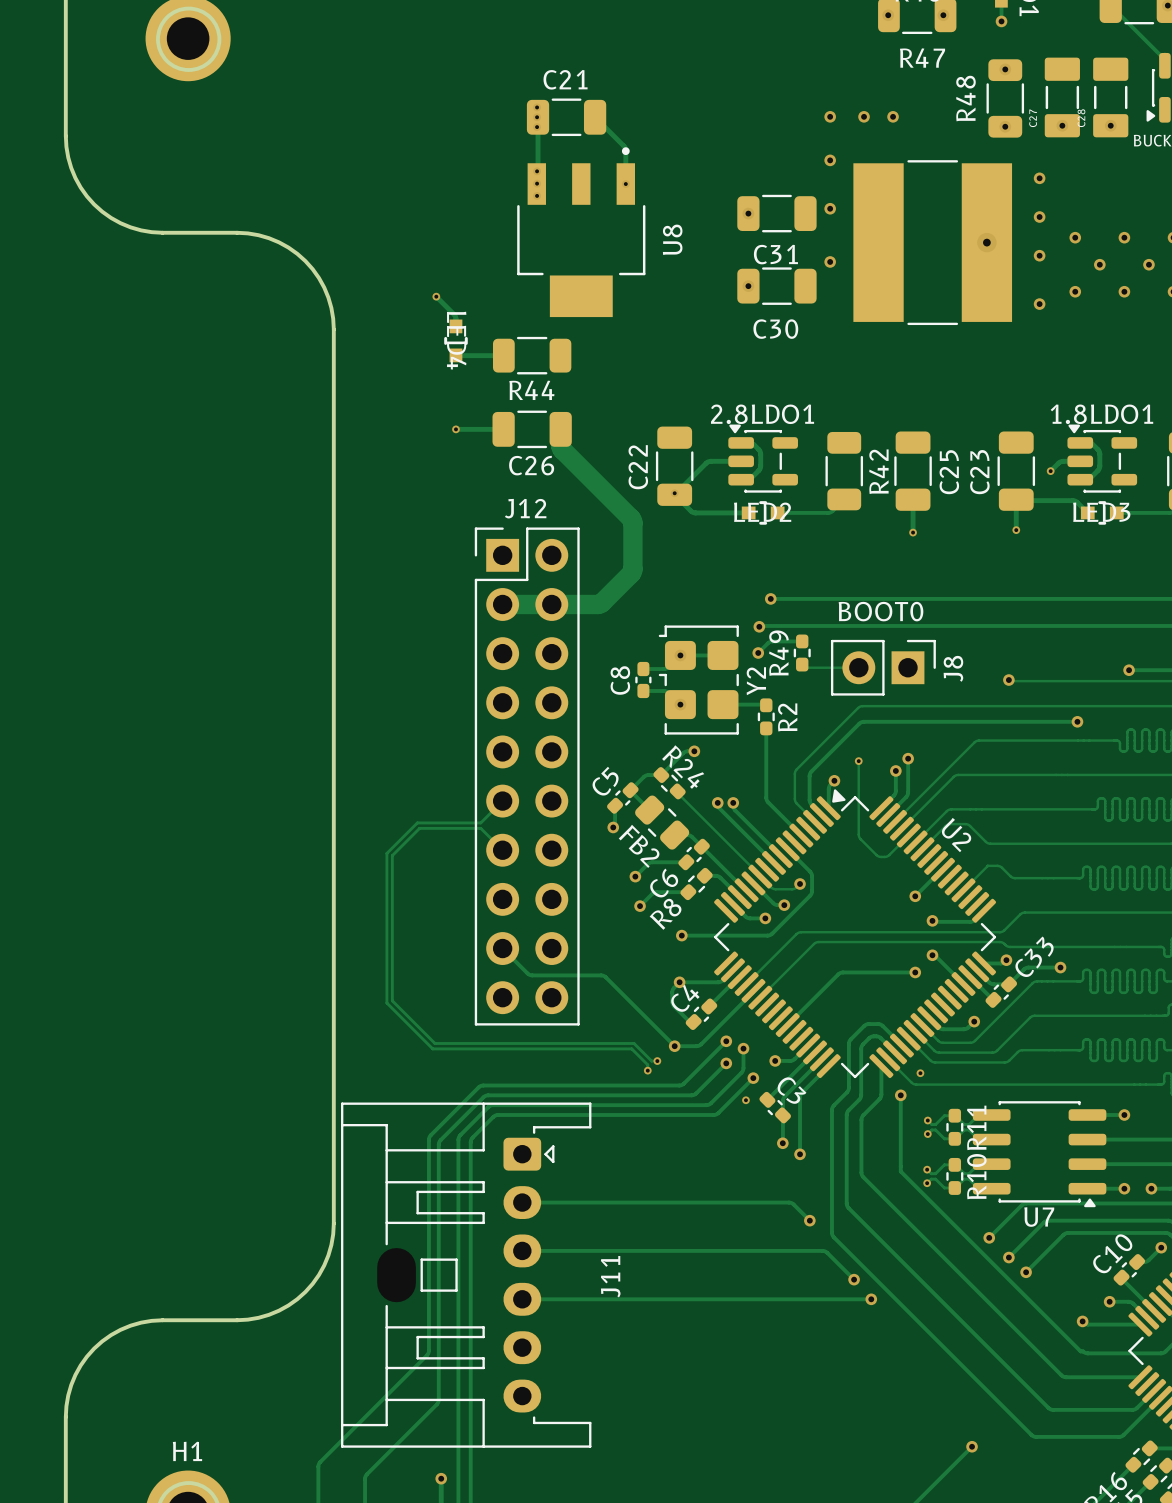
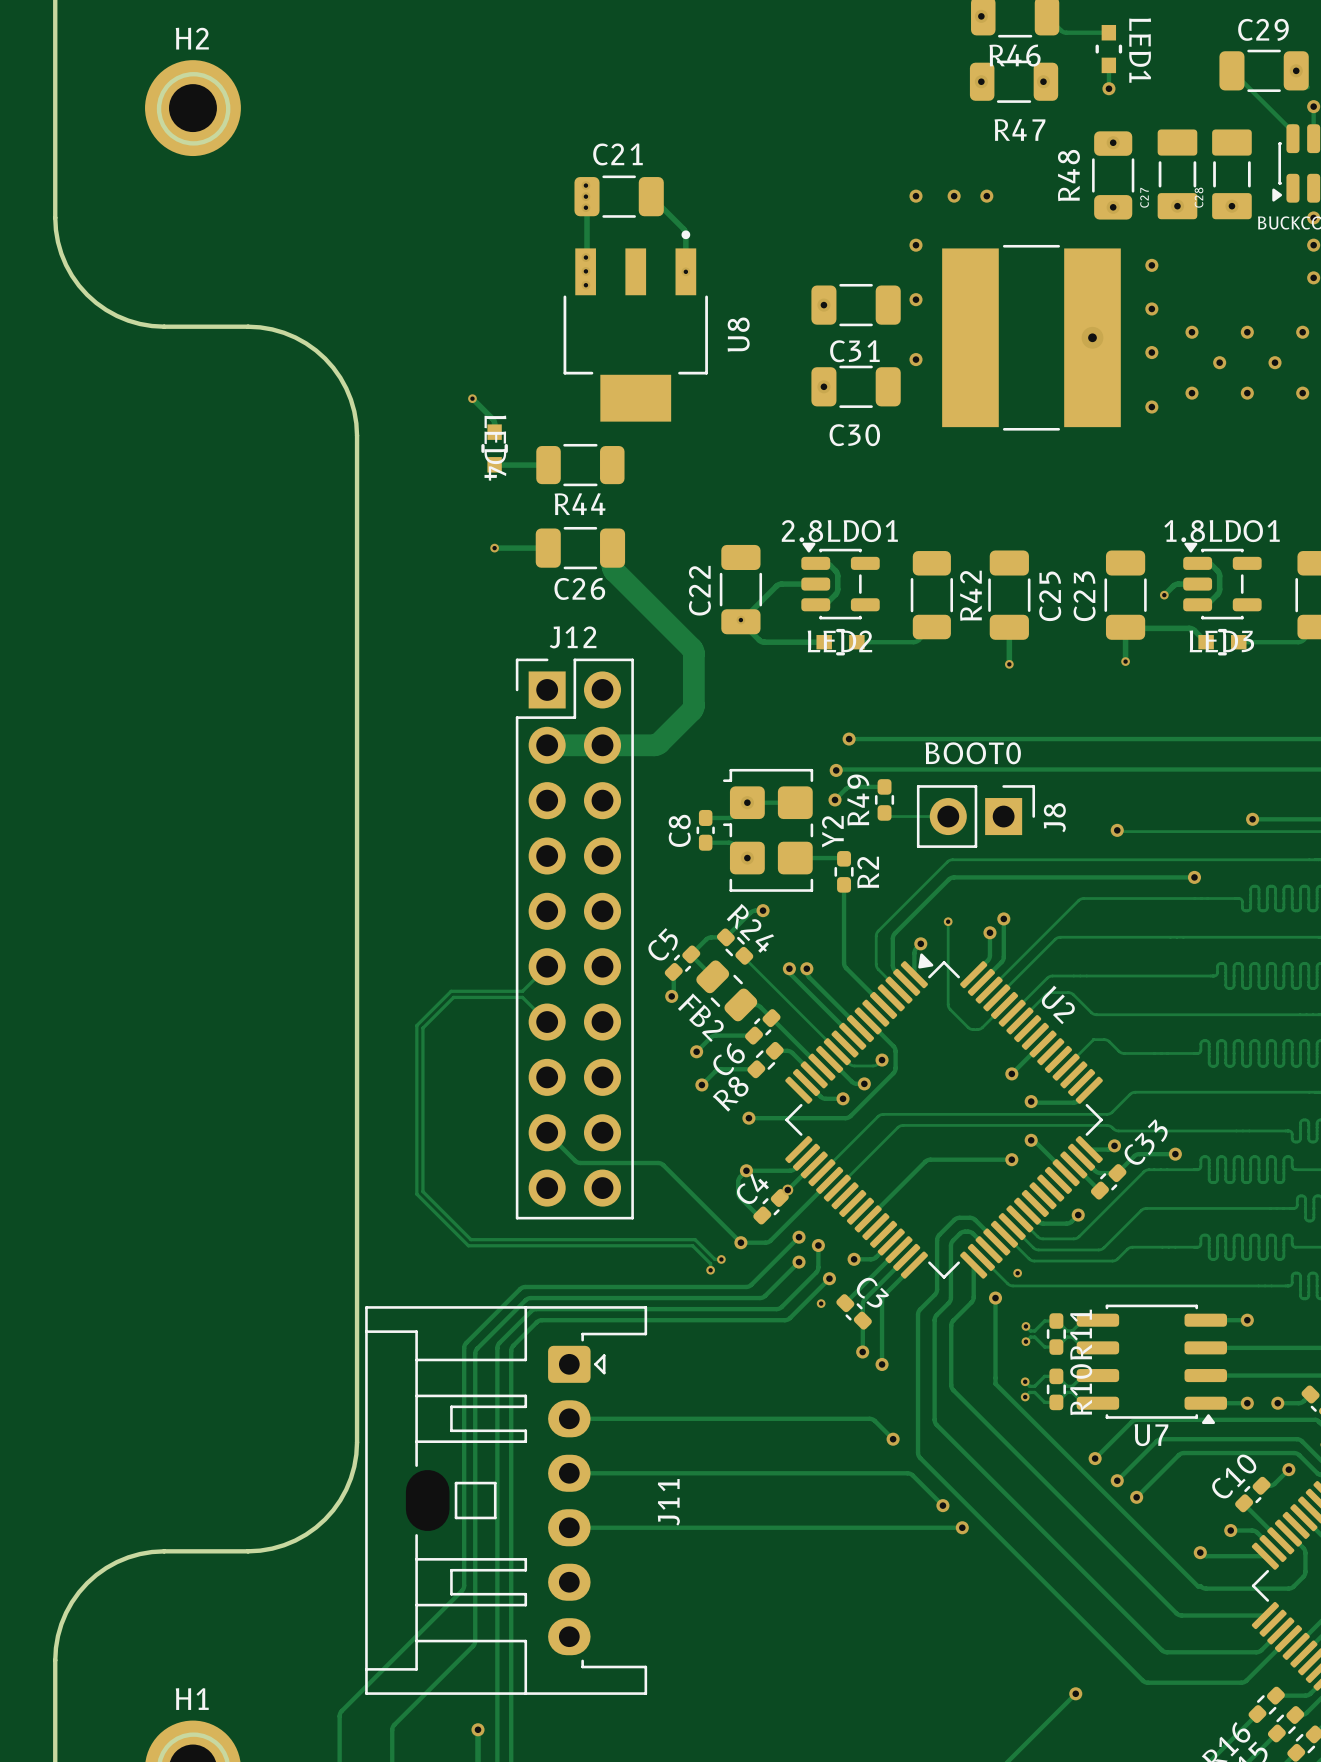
via: none -> (787, 1190)

